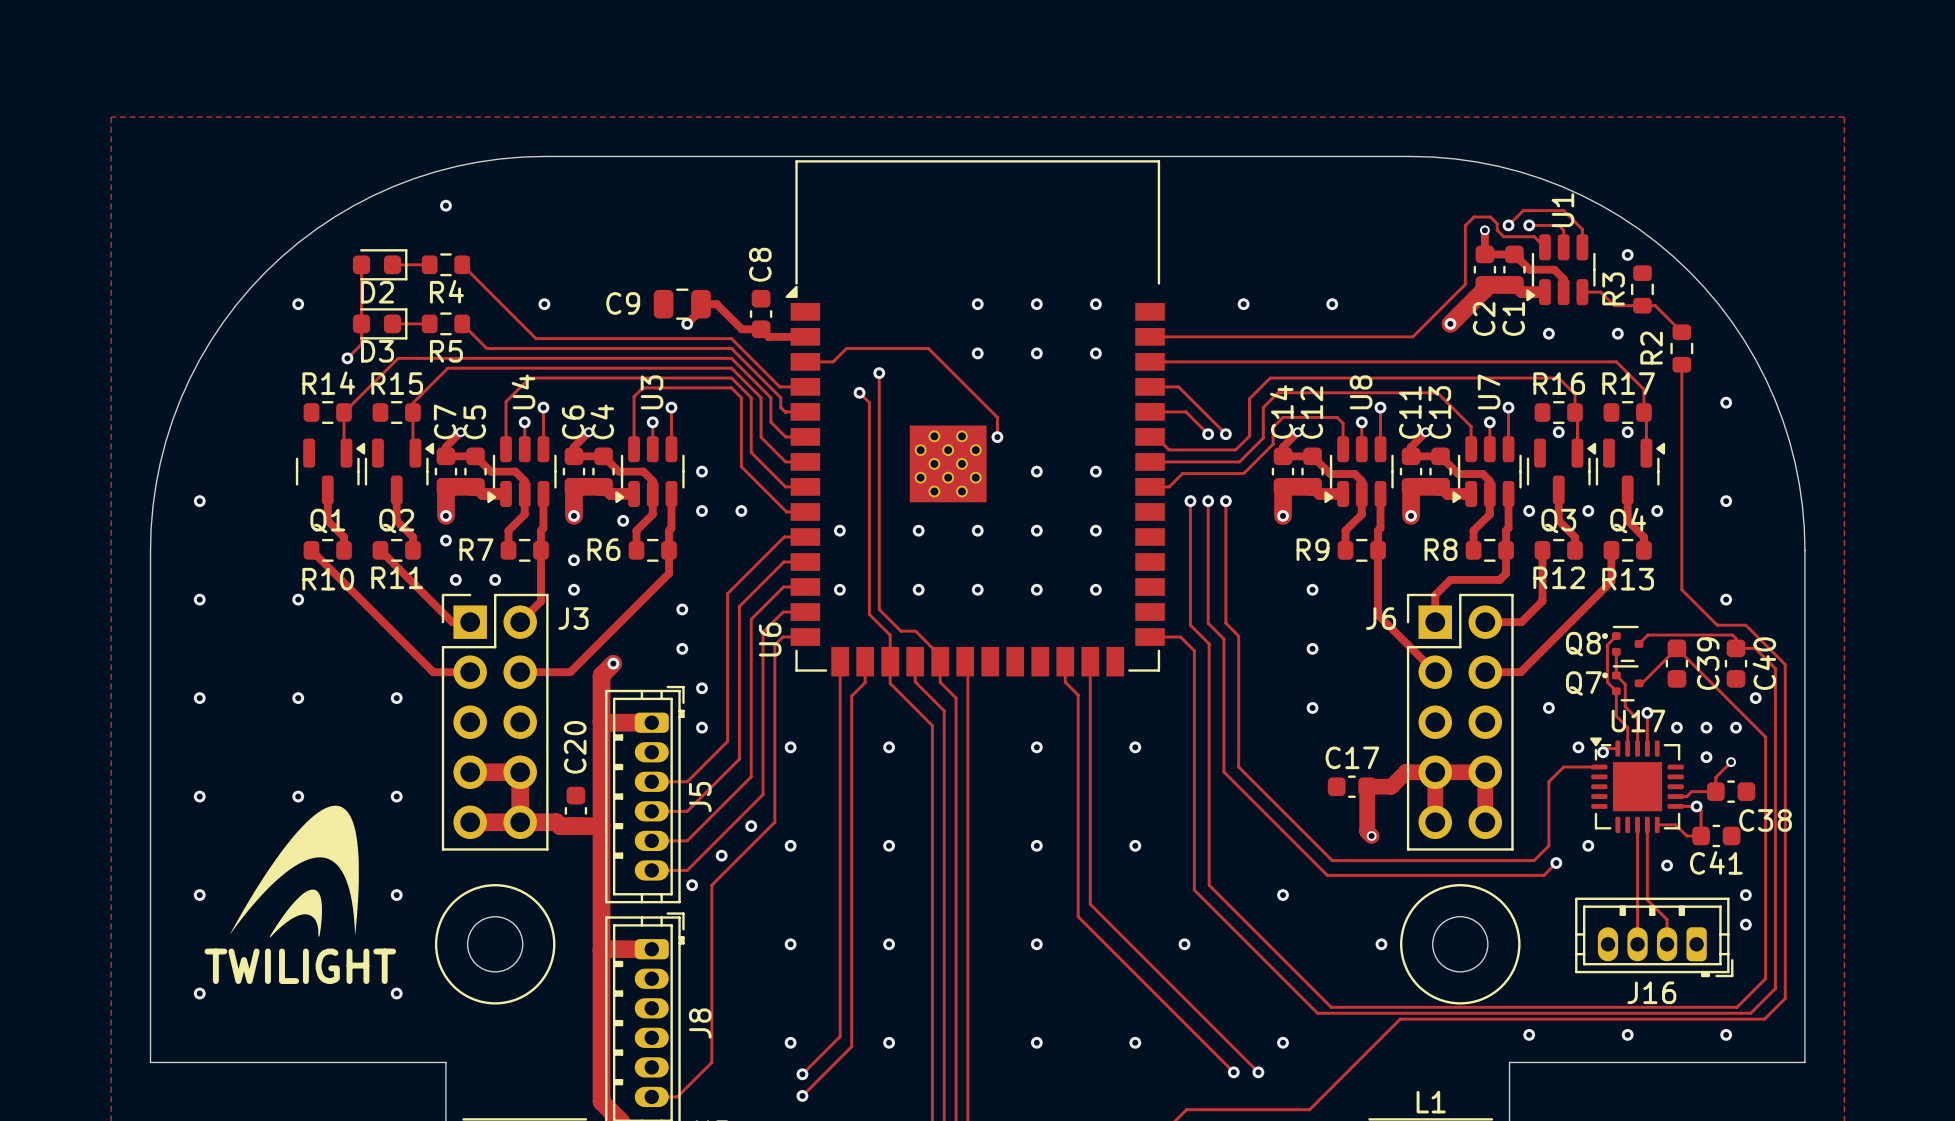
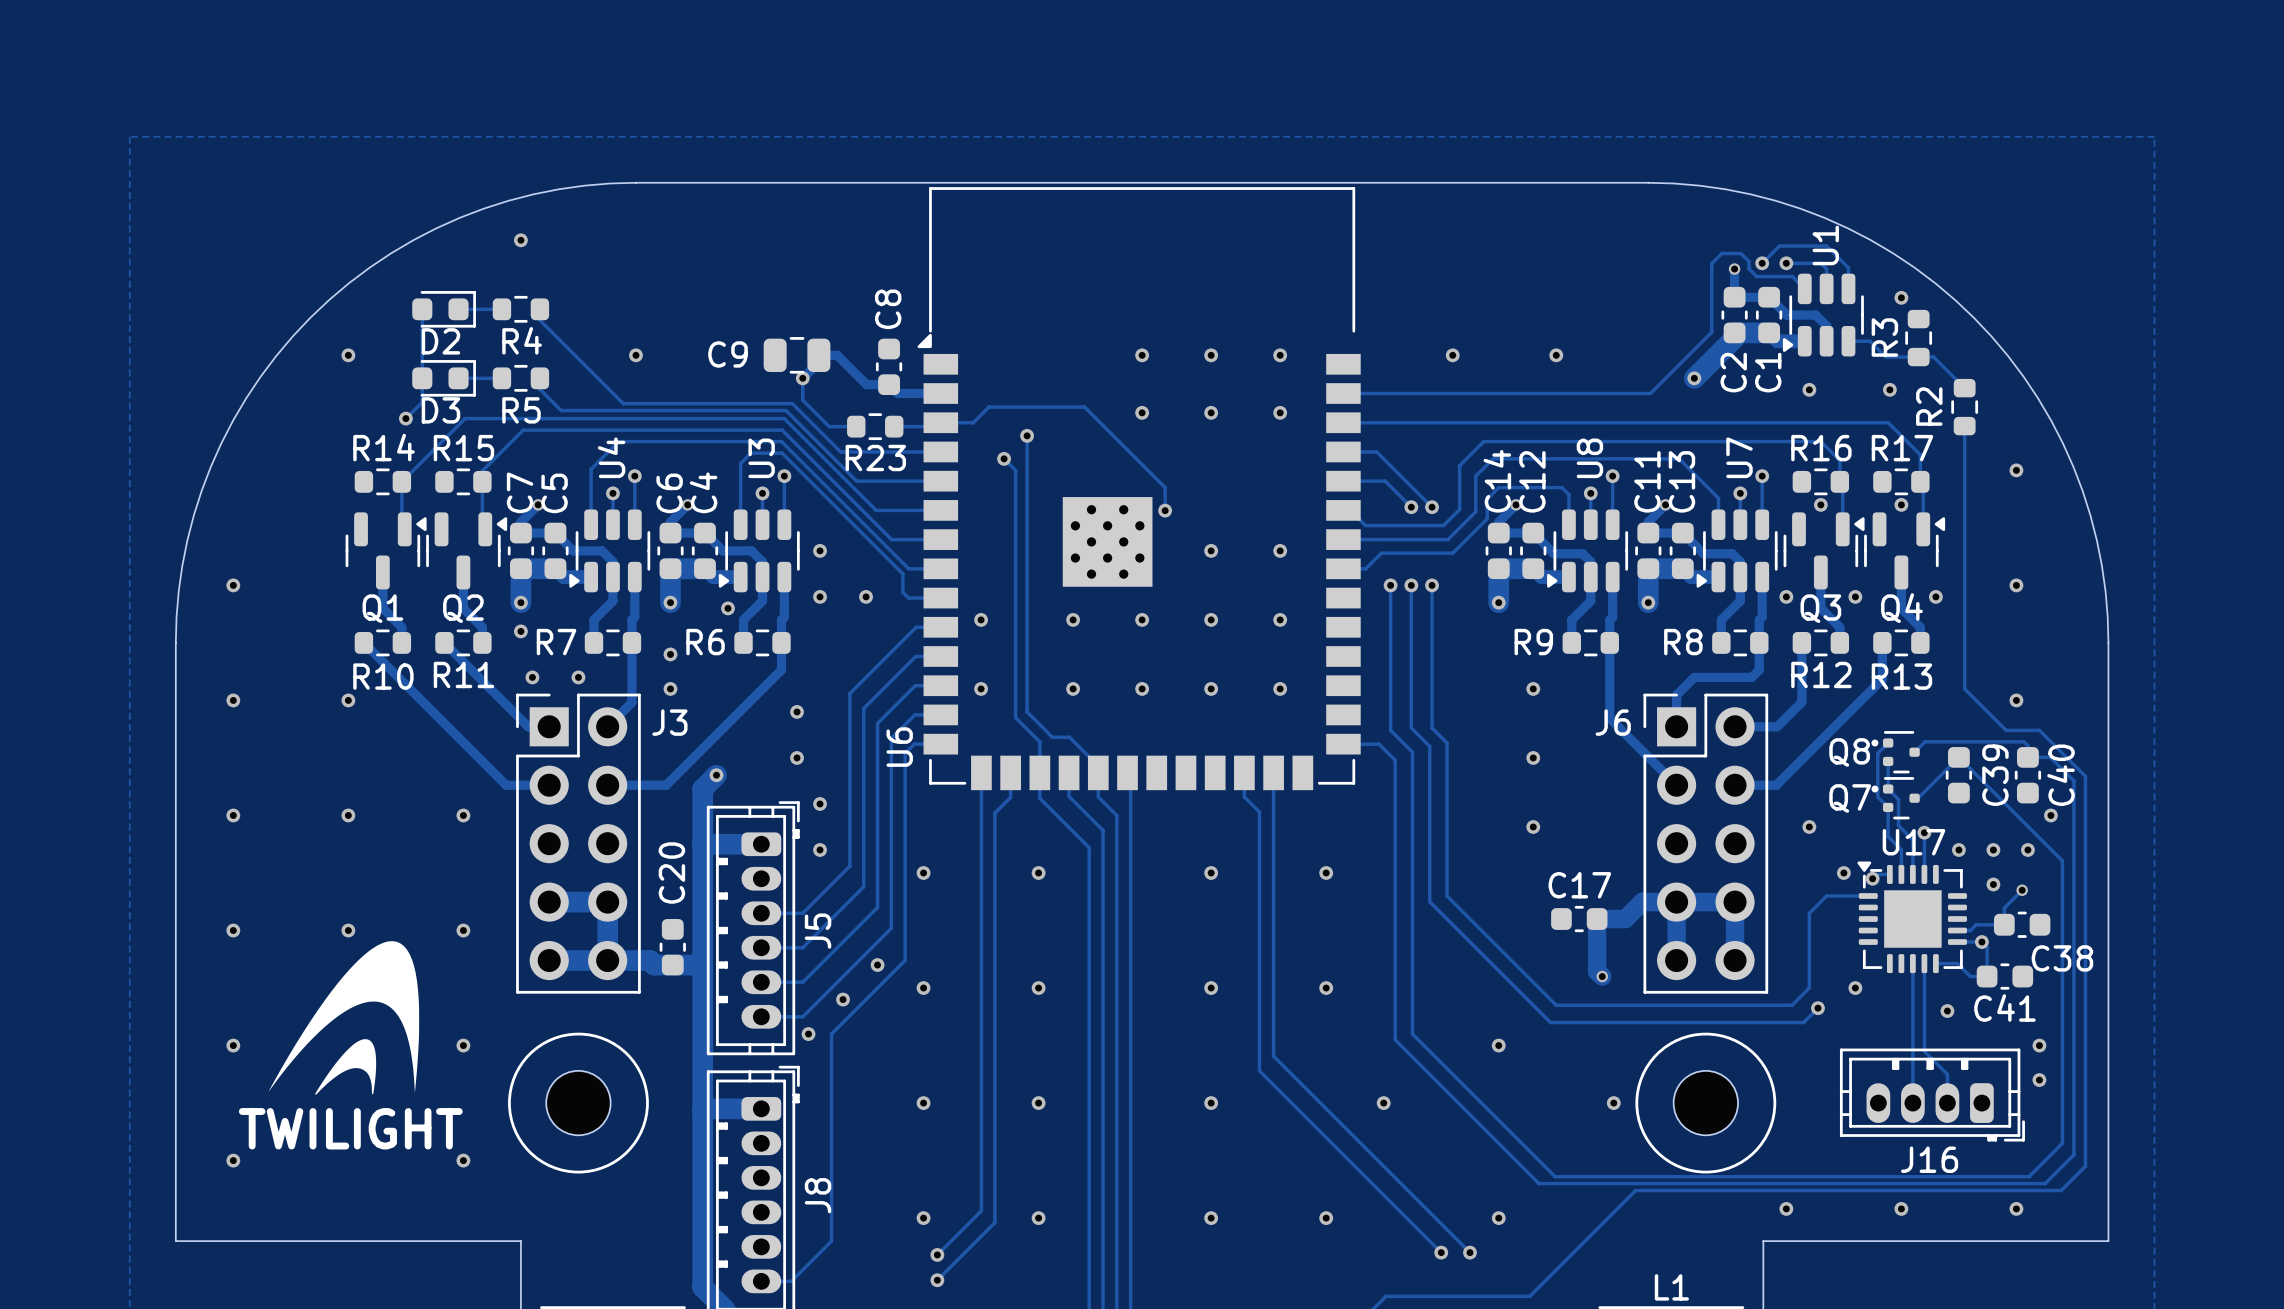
track: (462, 264) (536, 338) (731, 338) (779, 386) -> (539, 309) (539, 320) (623, 403) (792, 403) (840, 451) (910, 451)
track: (462, 323) (486, 348) (731, 348) (780, 397) (780, 407) (786, 411) -> (539, 378) (539, 389) (561, 410) (786, 410) (856, 481) (918, 481)
track: none -> (802, 378) (802, 400) (829, 426) (856, 426)
track: (671, 358) (731, 358) (770, 397) (770, 422) (785, 436) -> (784, 418) (876, 510) (917, 510)
track: none -> (940, 422) (935, 422) (931, 426) (894, 426)
R23: none -> (875, 426)
track: (669, 368) (731, 368) (761, 397) (761, 437) (785, 461) -> (782, 430) (891, 539) (917, 539)
track: (669, 378) (731, 378) (751, 397) (751, 452) (785, 486) -> (781, 441) (908, 568) (917, 568)
track: (669, 387) (731, 387) (741, 397) (741, 466) (786, 511) -> (782, 453) (902, 573) (902, 592) (908, 598) (918, 598)

